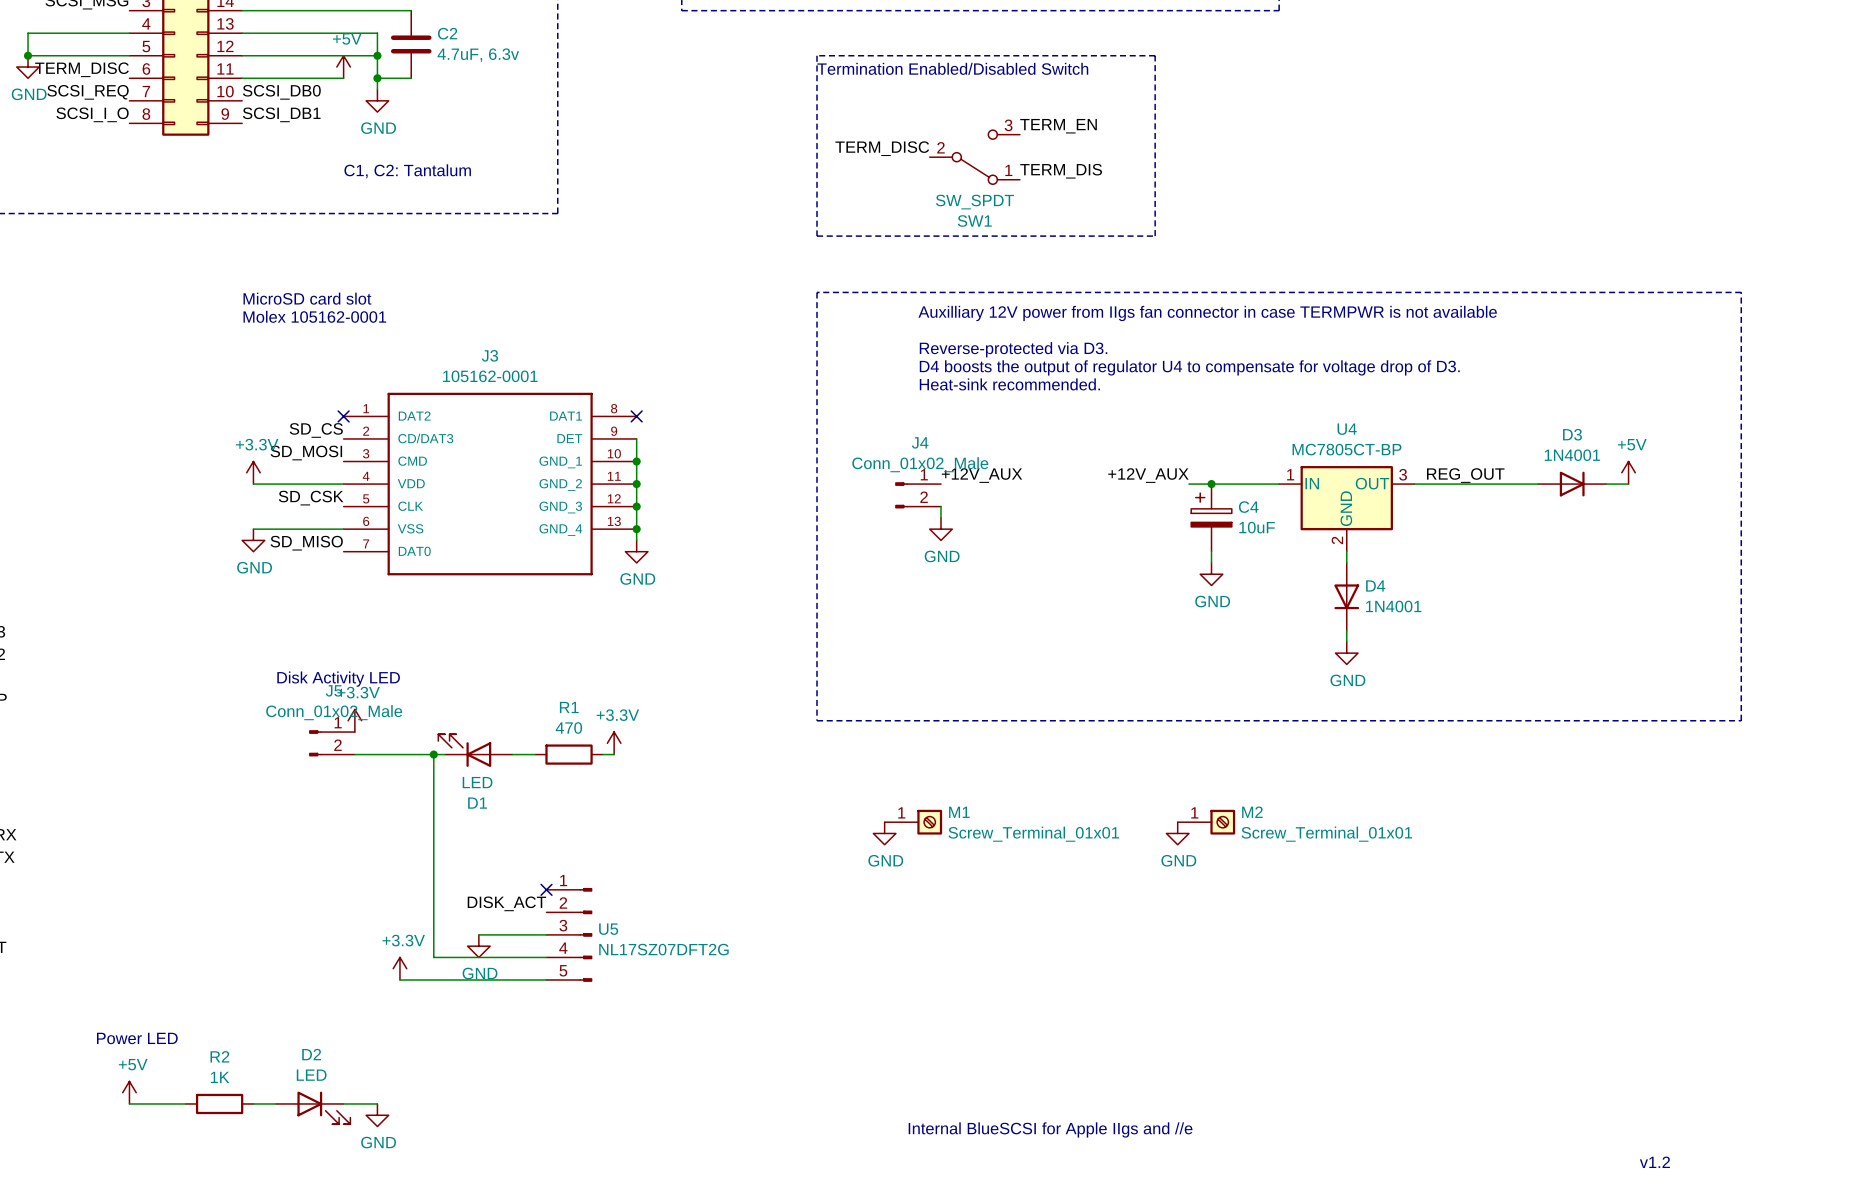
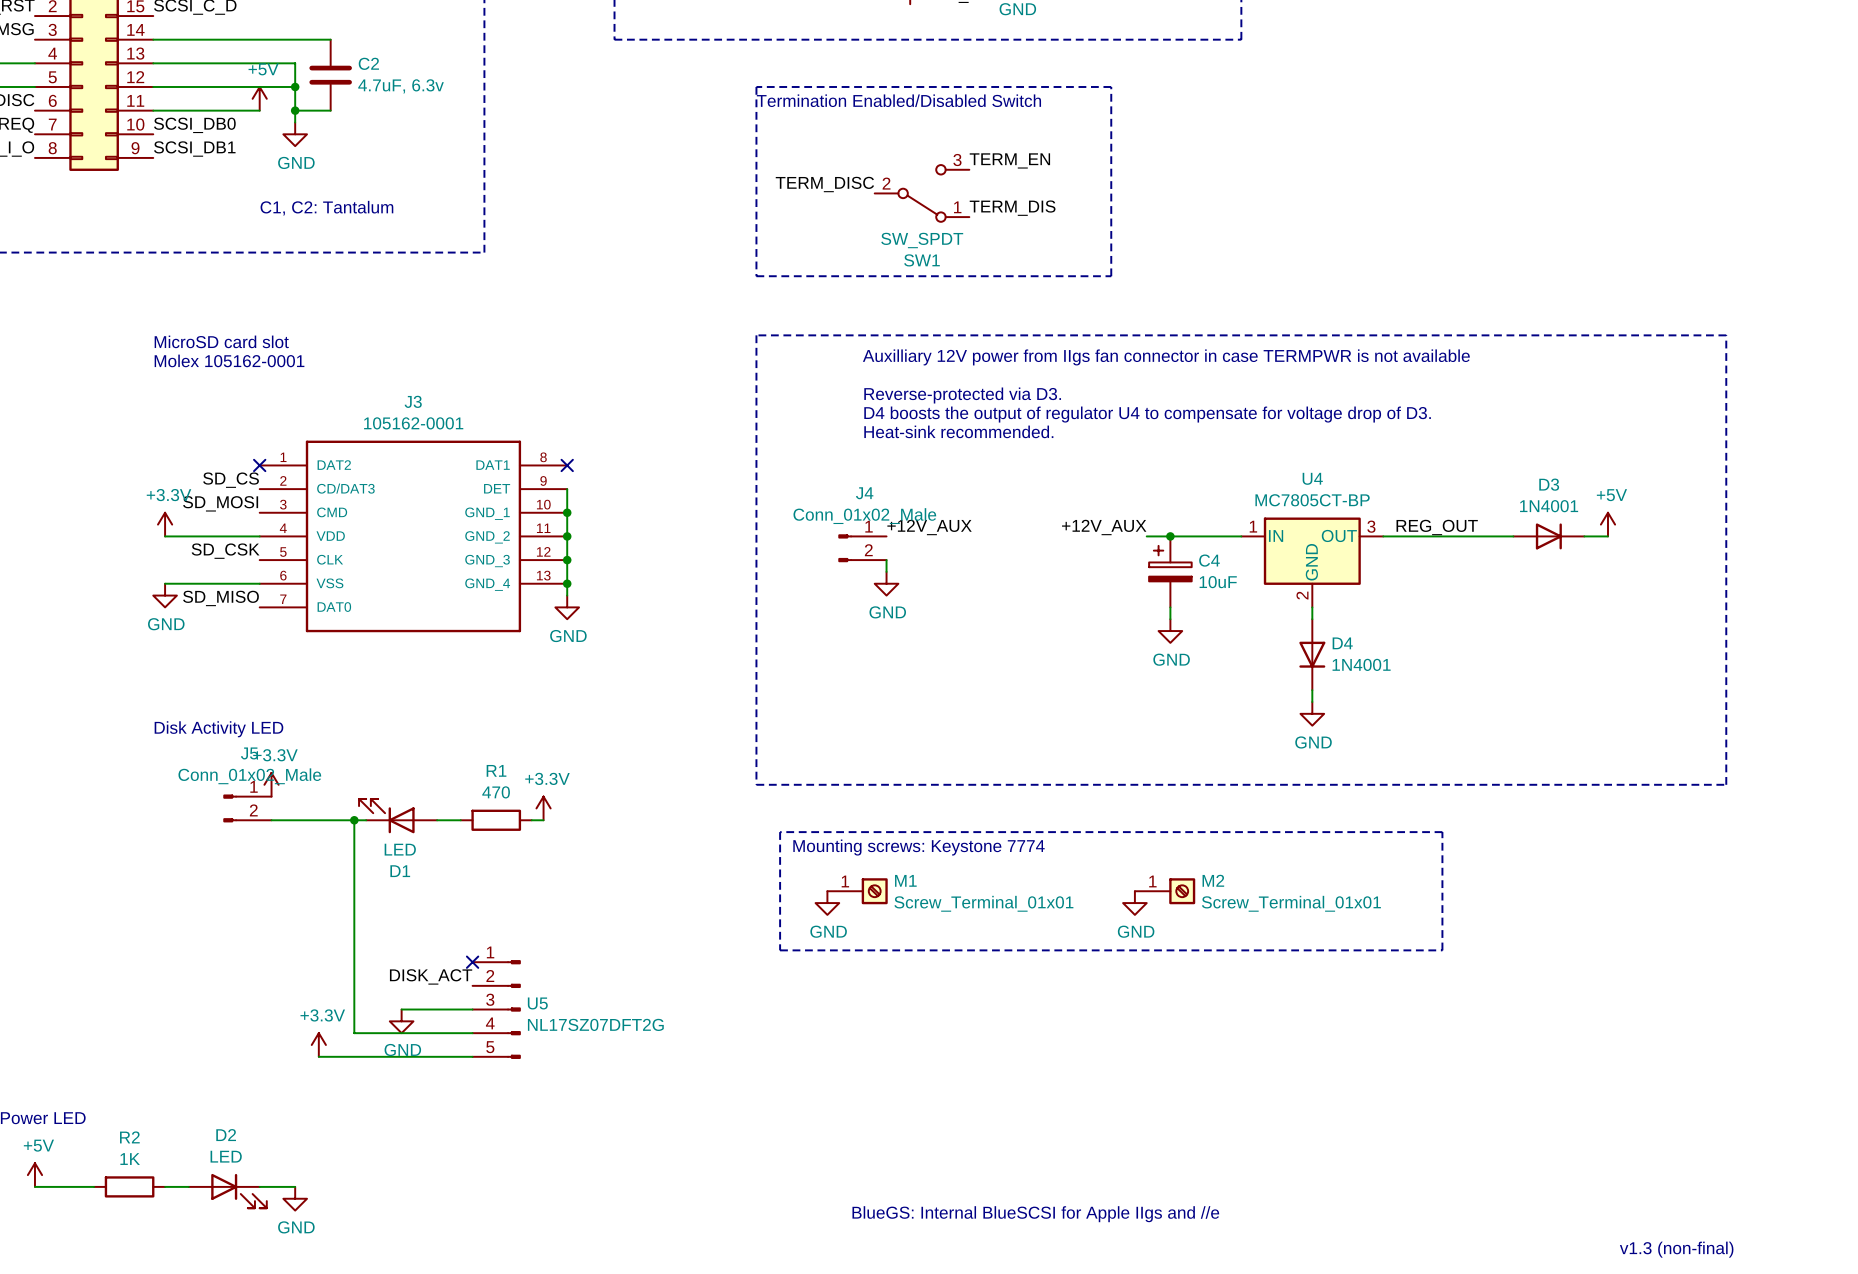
text position: Disk Activity LED (338, 679) -> Disk Activity LED (218, 729)
line: none -> (780, 832) (780, 950) (1442, 950) (1442, 832) (780, 832)
text: none -> Mounting screws: Keystone 7774 (918, 847)
text: Internal BlueSCSI for Apple IIgs and //e (1050, 1129) -> BlueGS: Internal BlueSCSI for Apple IIgs and //e (1035, 1214)
text: v1.2 (1654, 1162) -> v1.3 (non-final) (1676, 1249)

